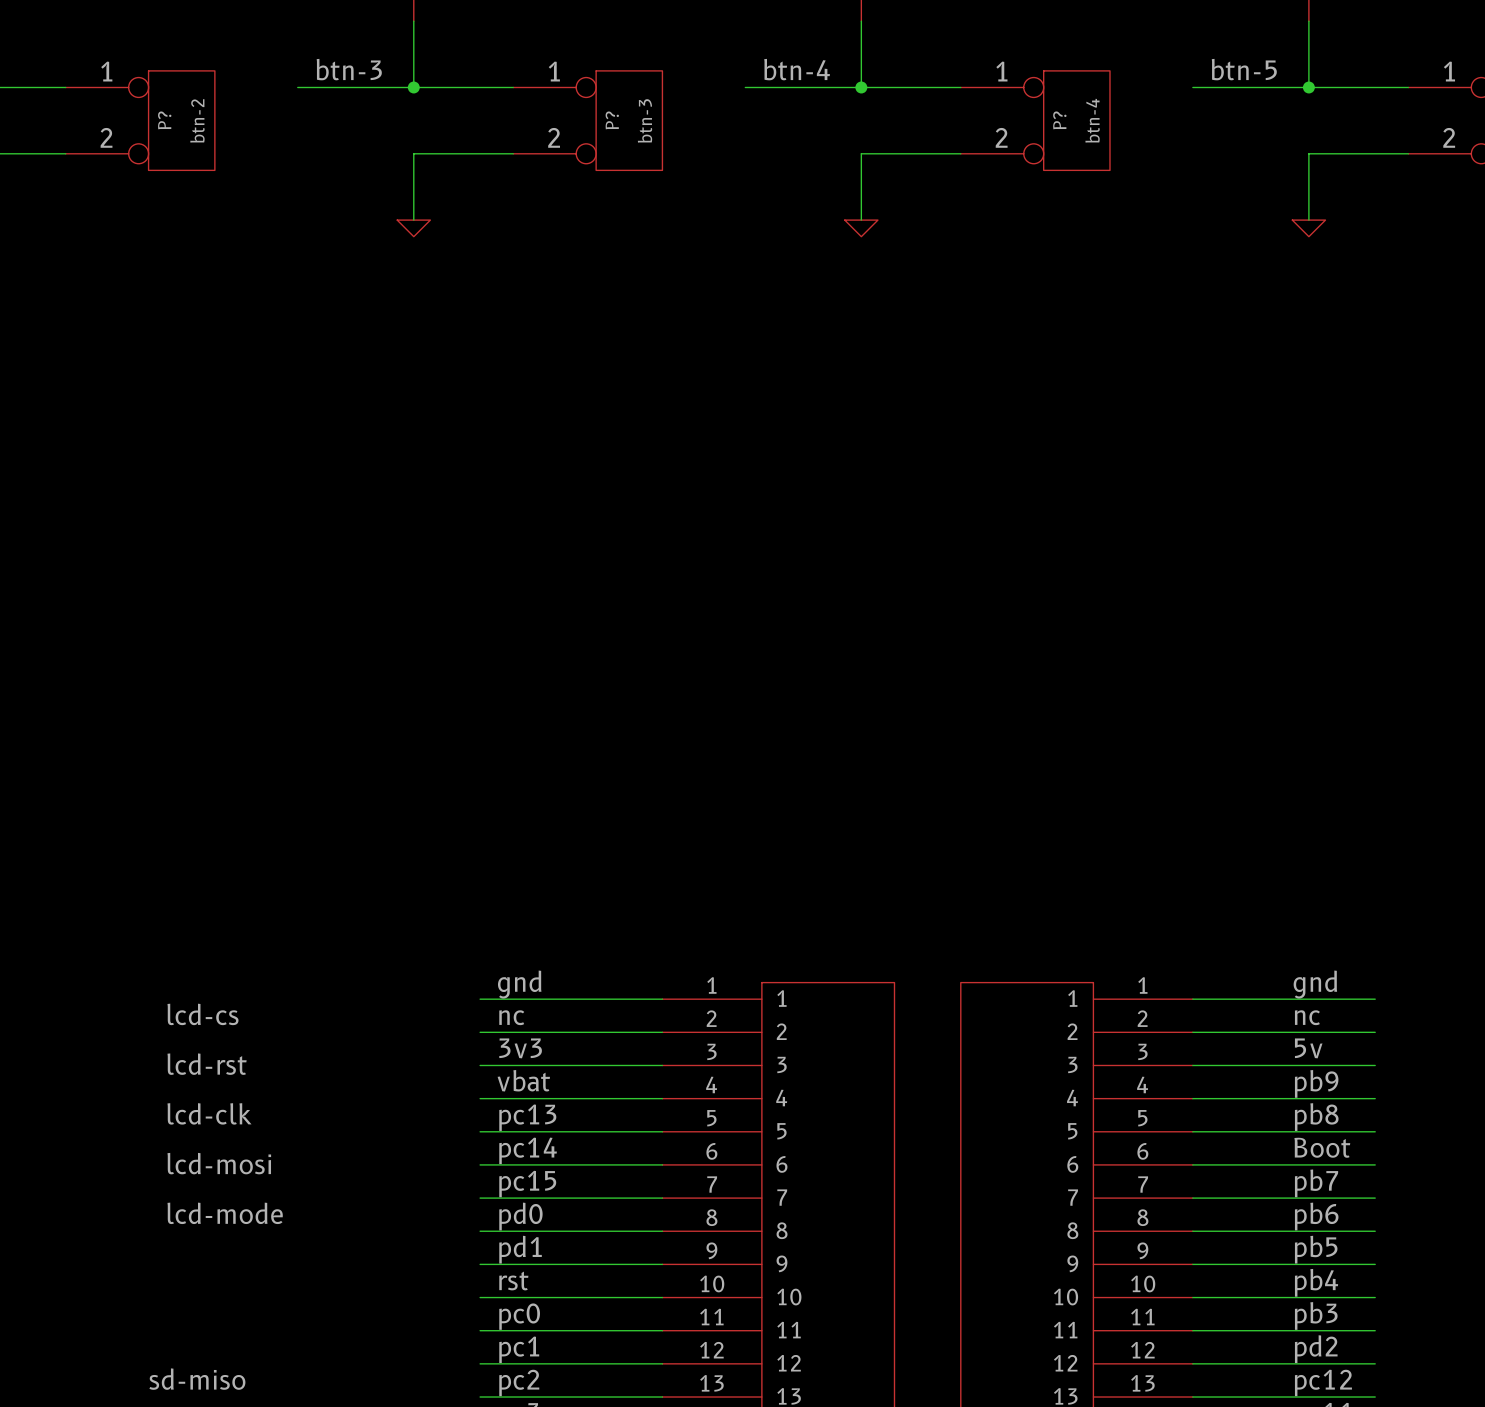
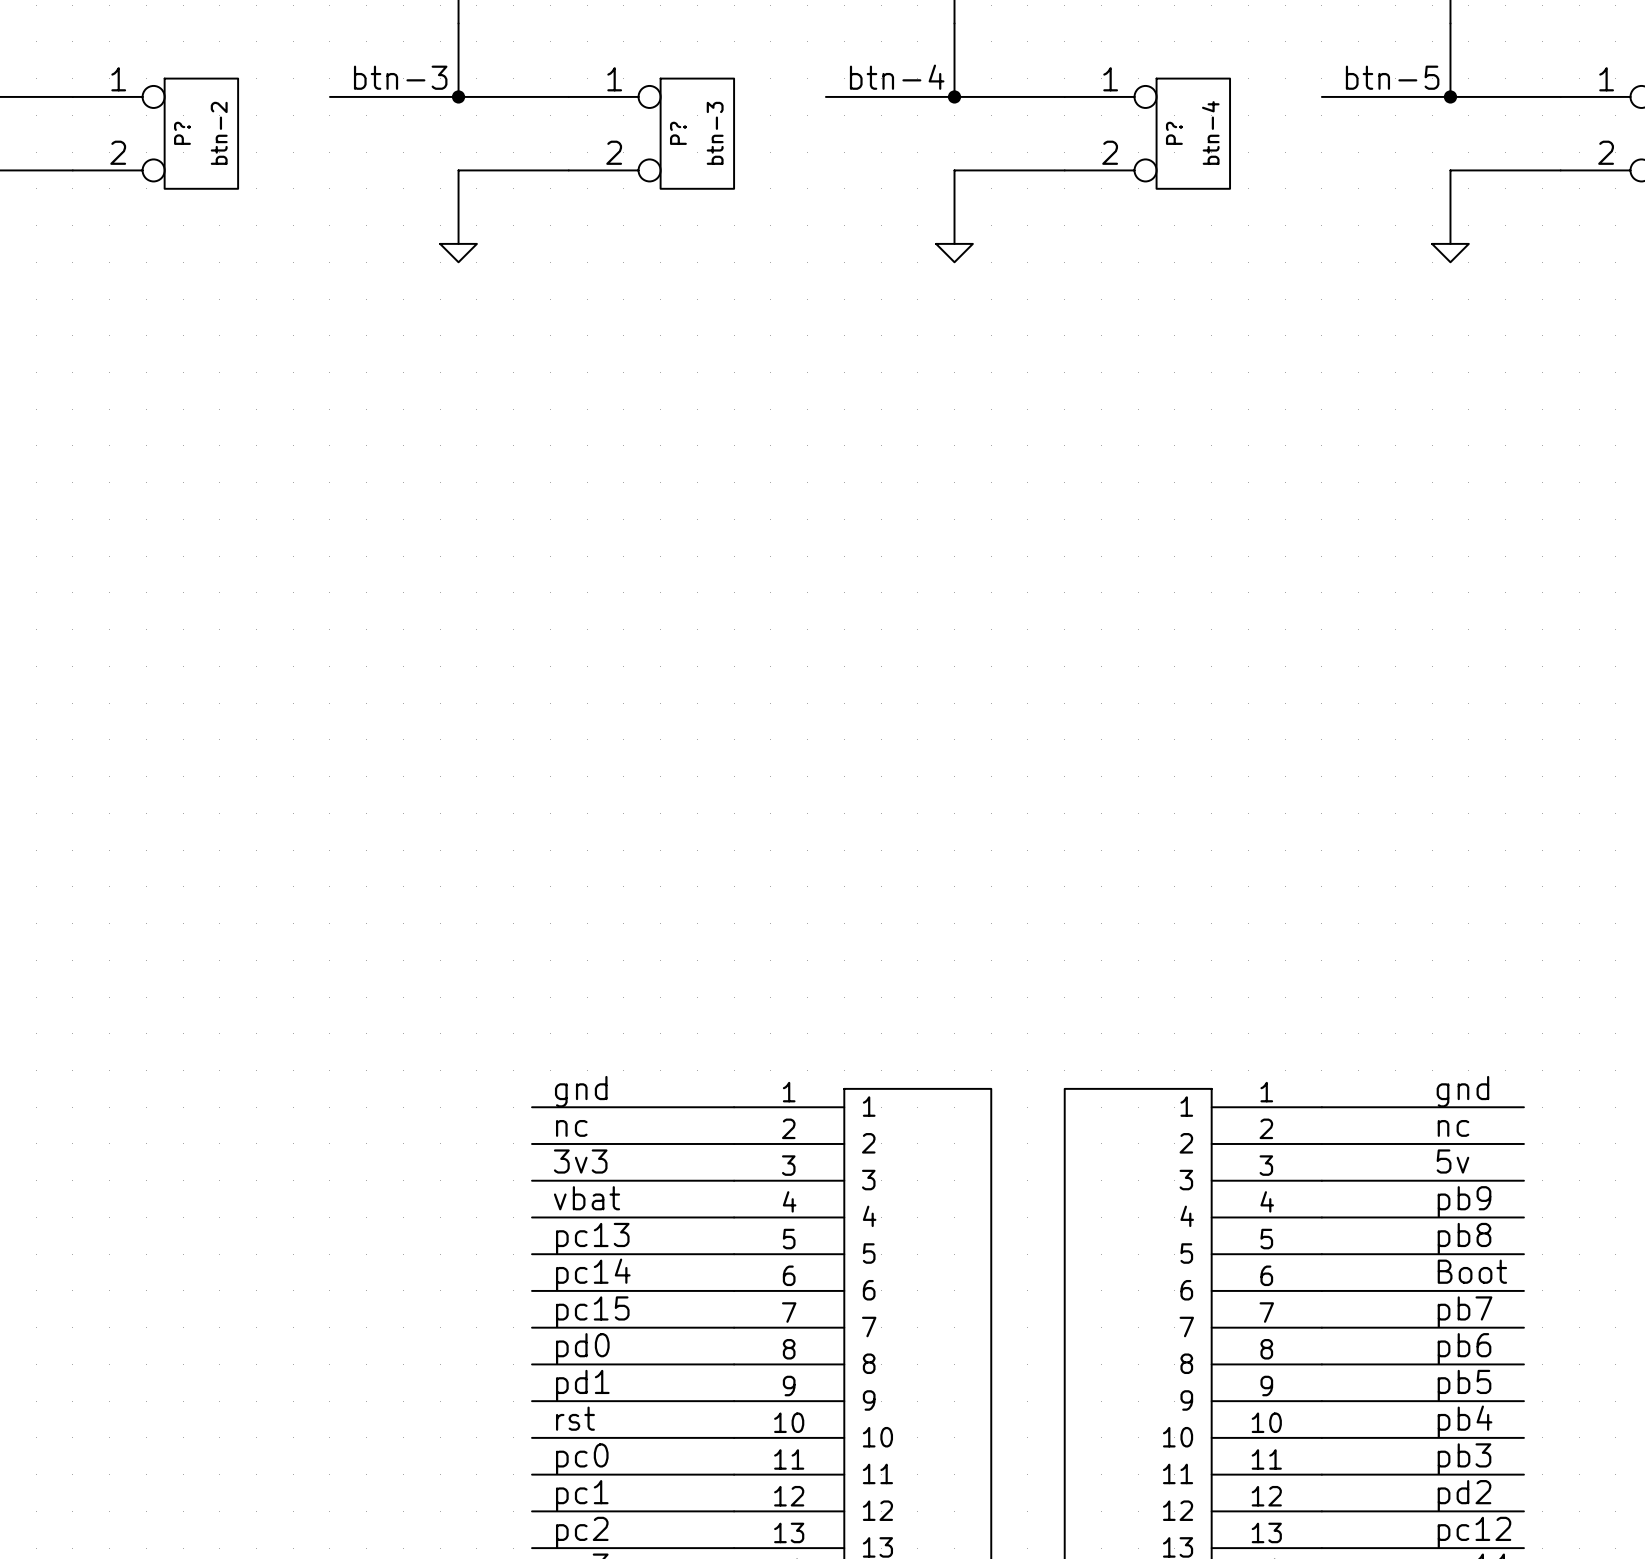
label: lcd-cs (203, 1014) -> none
label: lcd-rst (207, 1064) -> none
label: lcd-clk (209, 1113) -> none
label: lcd-mosi (219, 1163) -> none
label: lcd-mode (225, 1213) -> none
label: sd-miso (197, 1379) -> none

